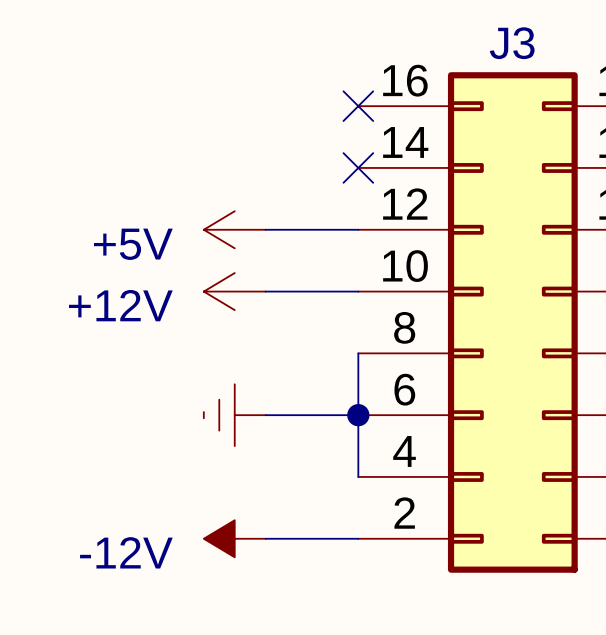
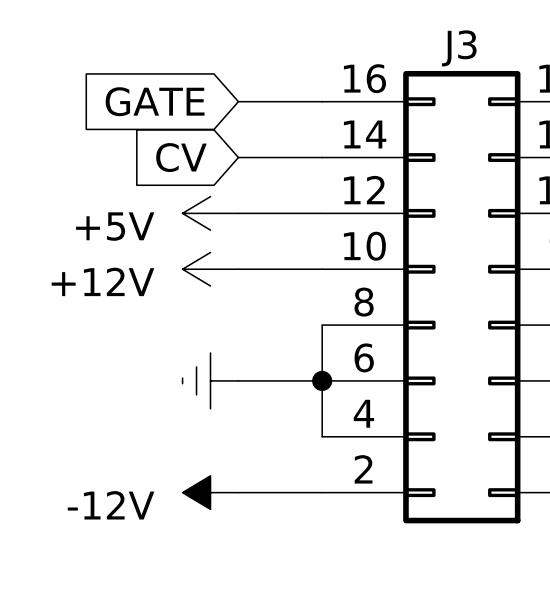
global label: none -> GATE (155, 101)
wire: none -> (238, 101) (322, 101)
no-connect mark: (358, 106) -> none
global label: none -> CV (181, 157)
wire: none -> (238, 157) (322, 157)
no-connect mark: (358, 167) -> none

